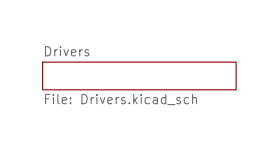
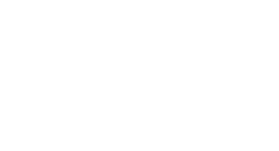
sheet Drivers: File: Drivers.kicad_sch (139, 75) -> none

